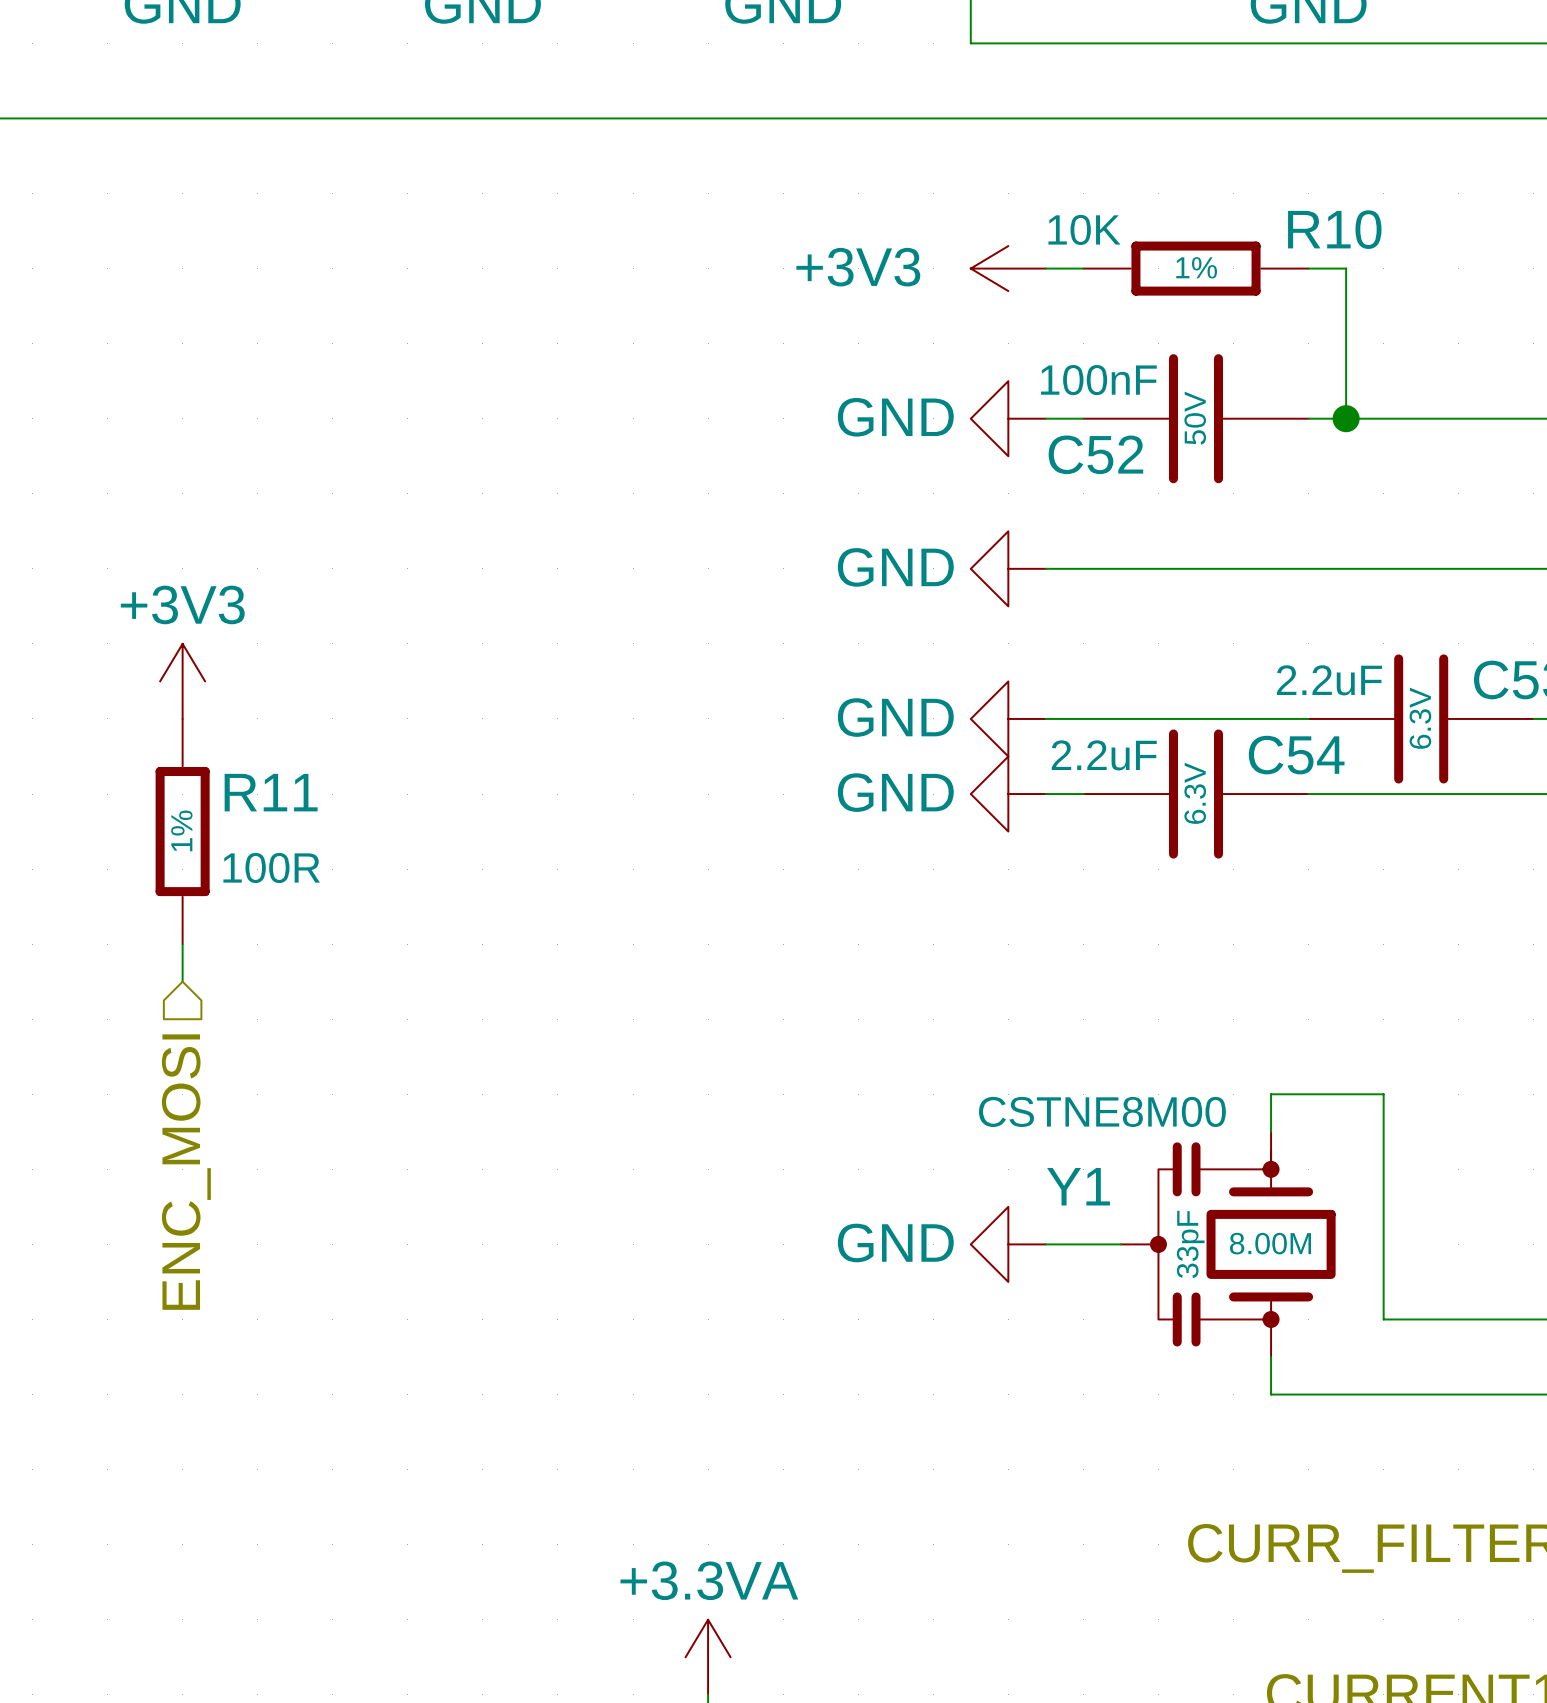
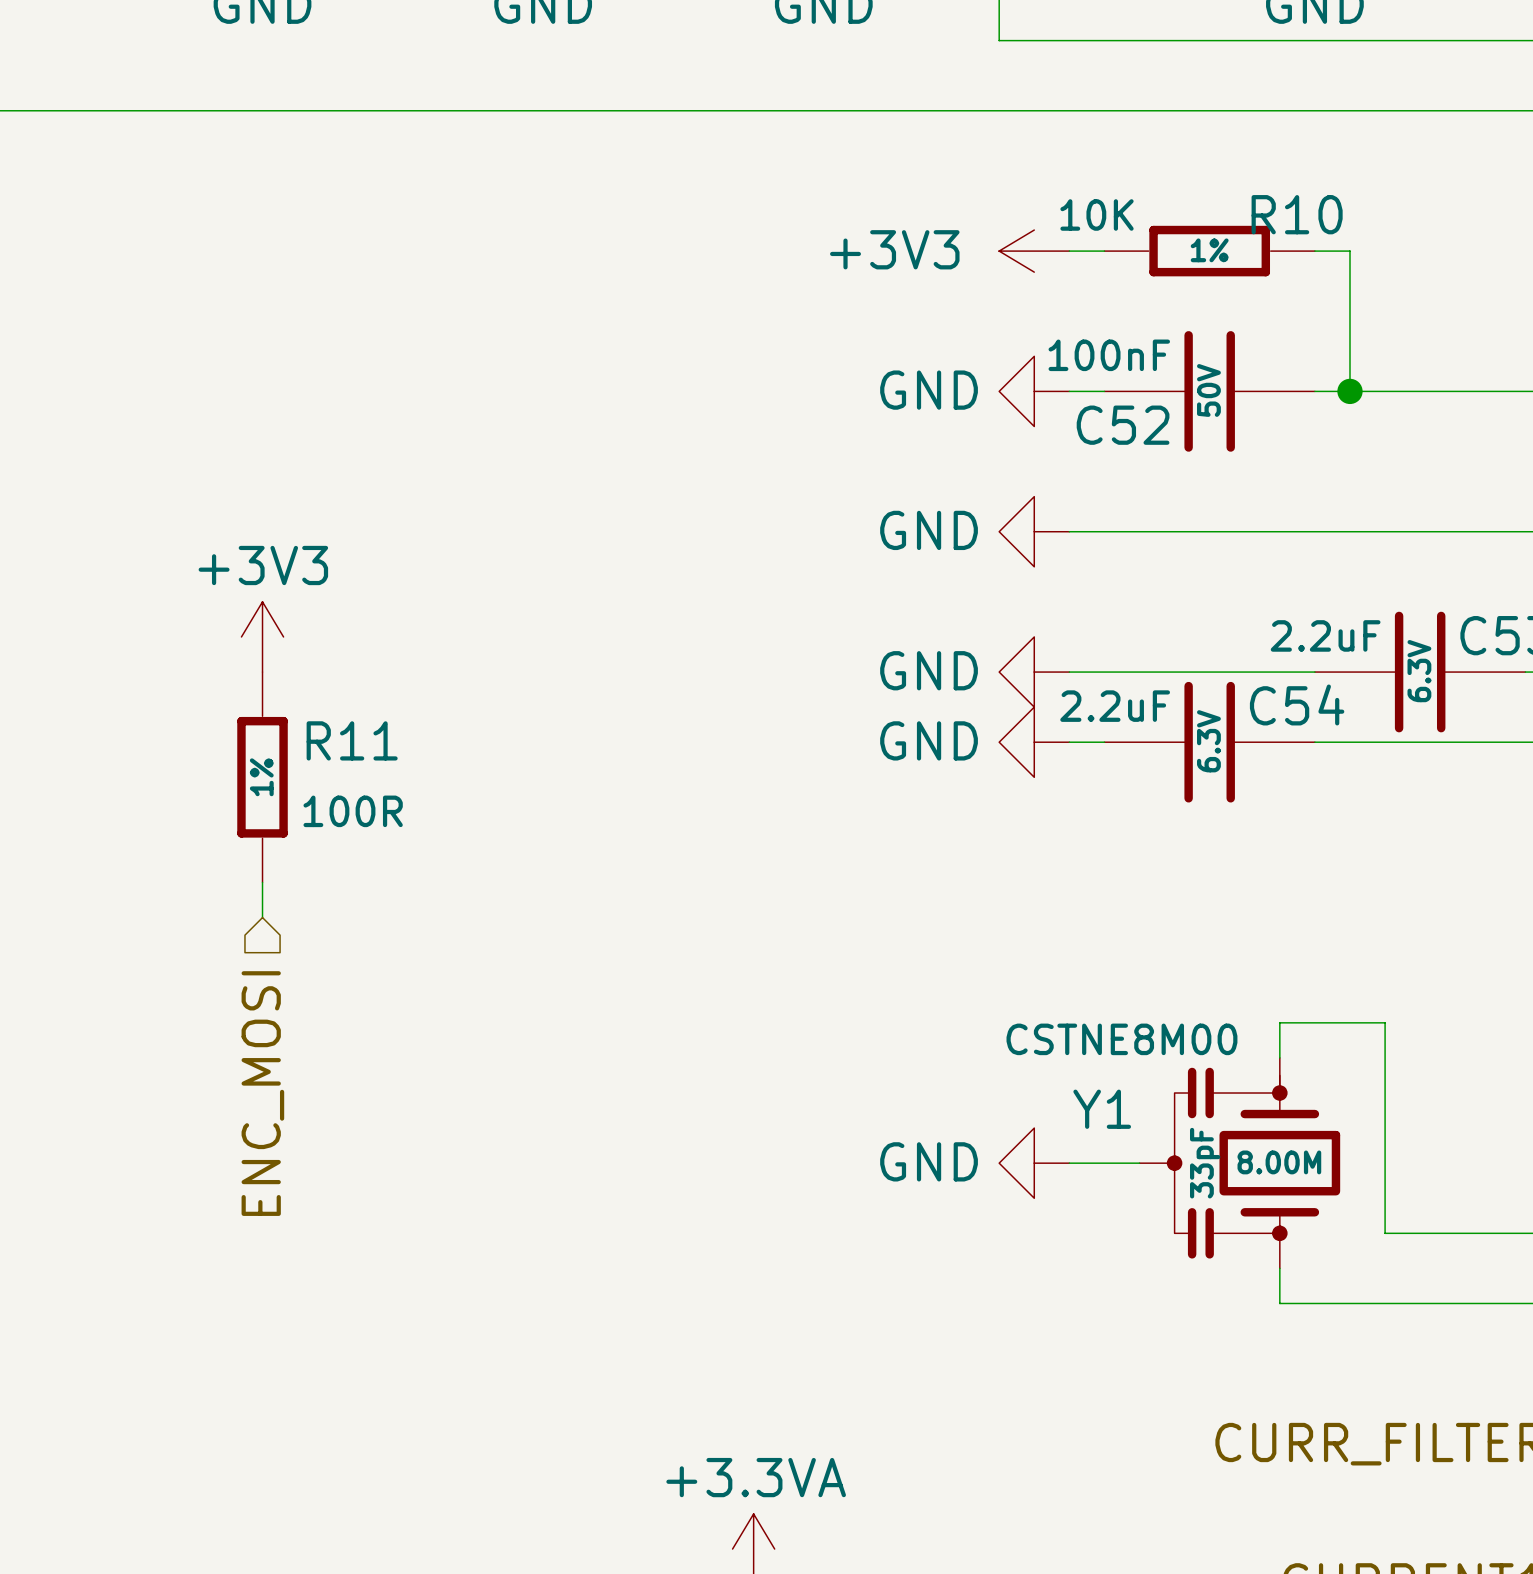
R10 name position: R10 (1334, 229) -> R10 (1297, 214)

